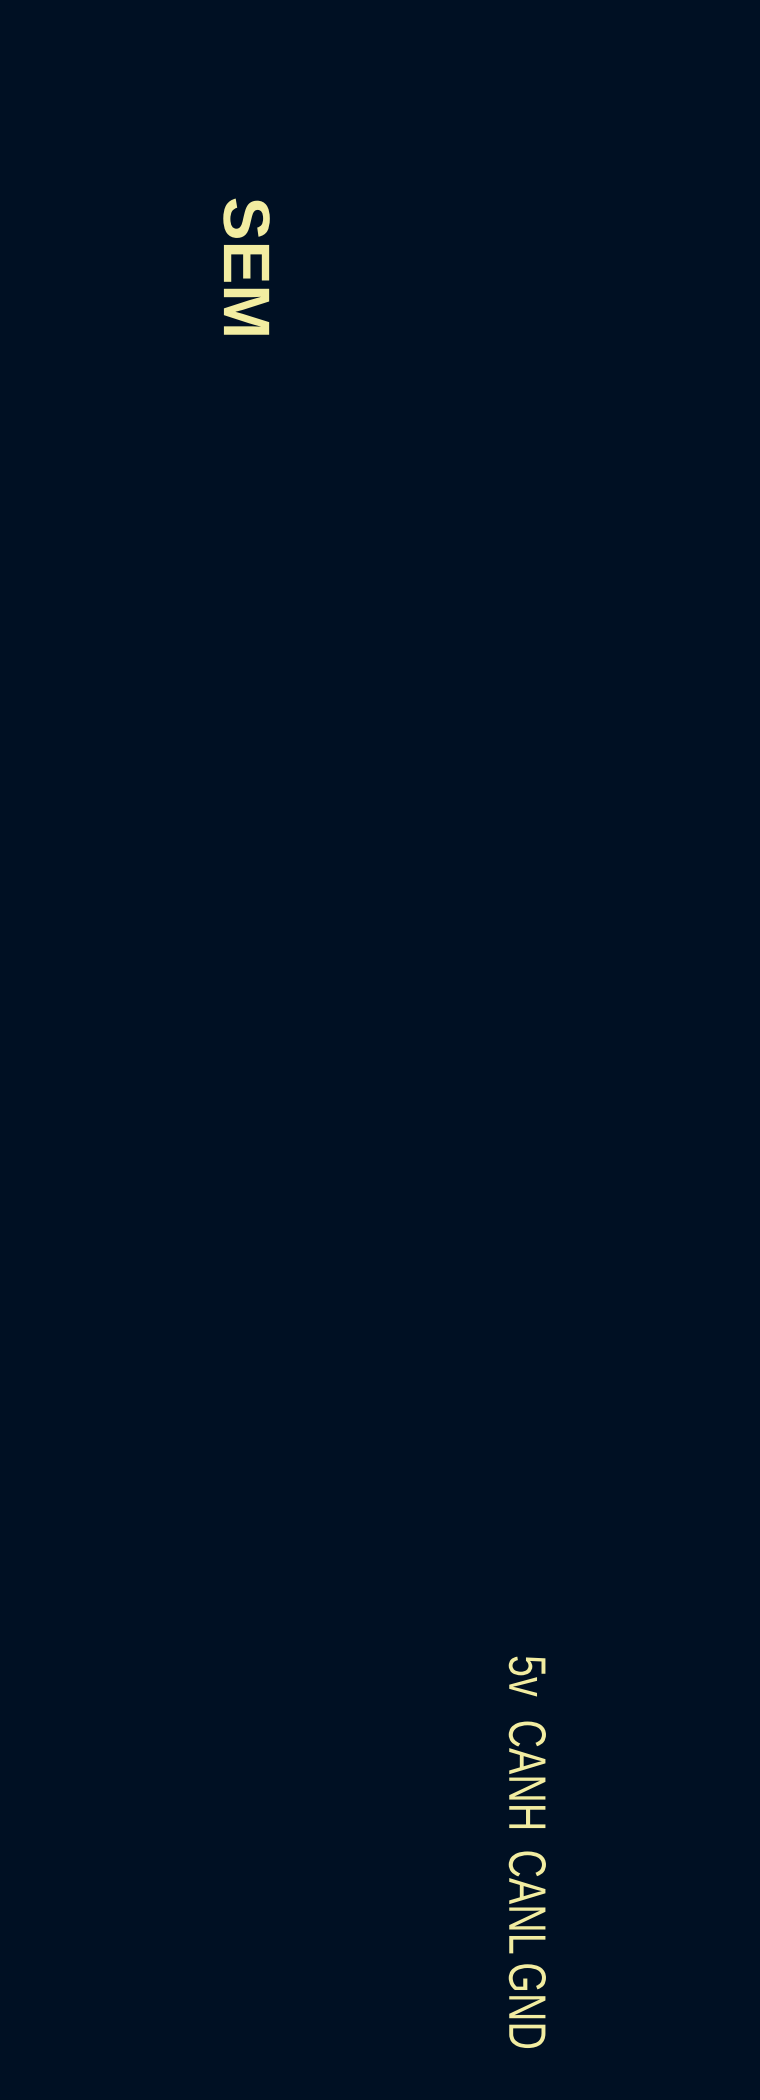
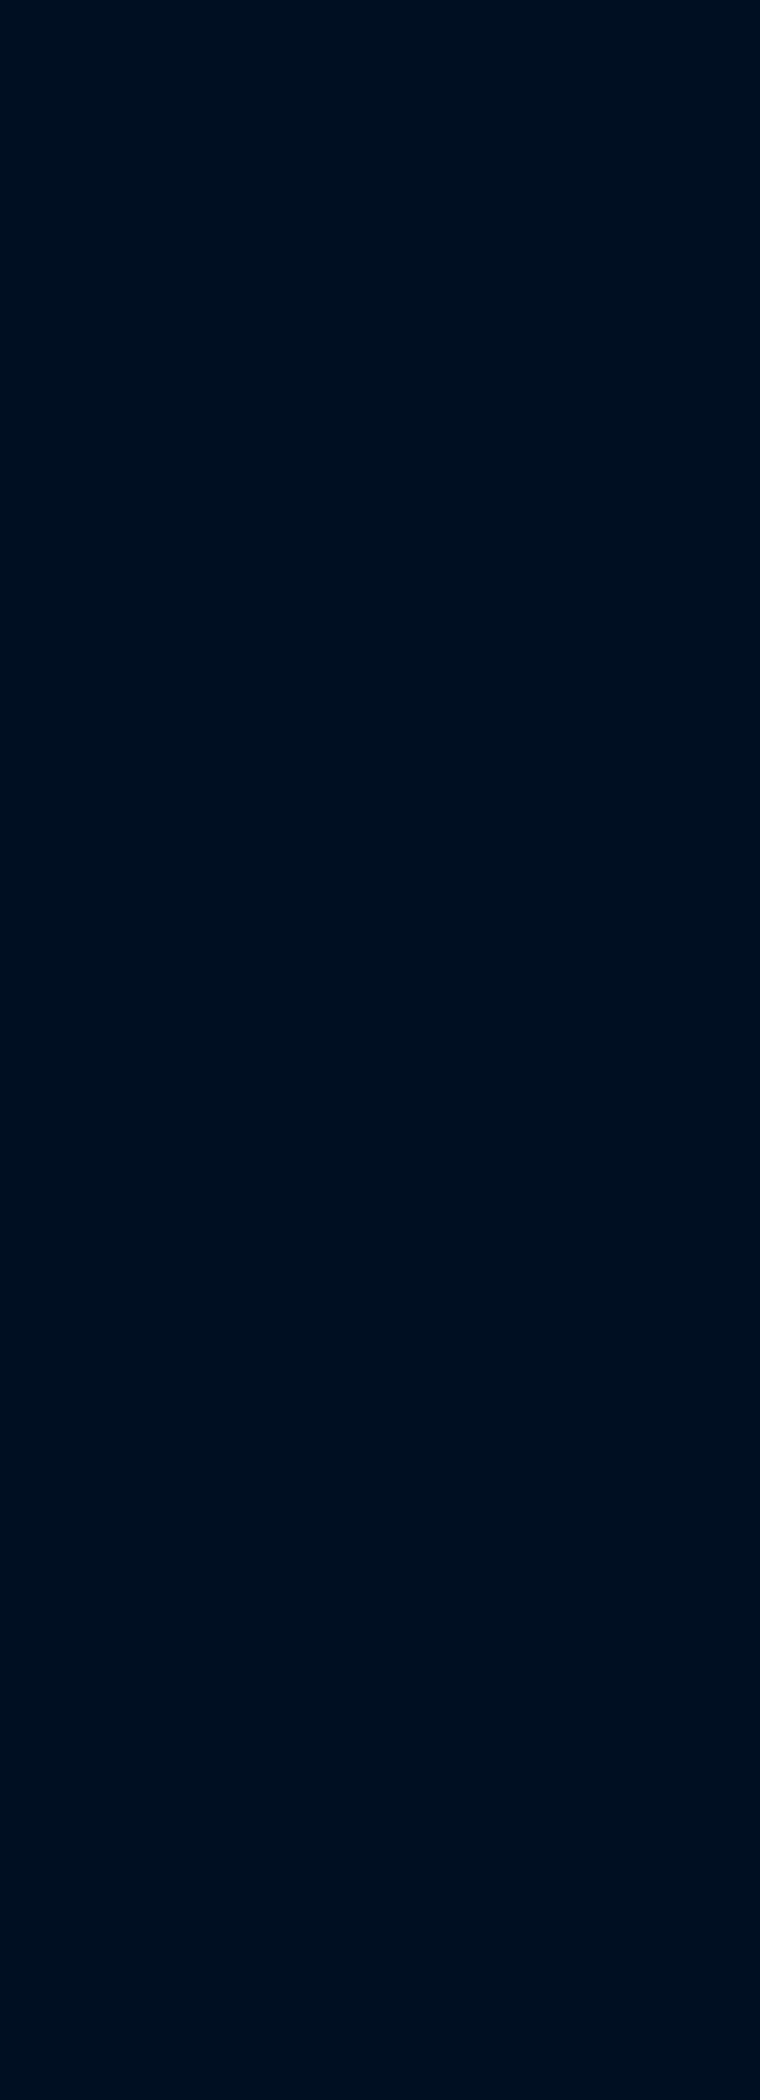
text: SEM (246, 266) -> none
text: 5v (527, 1676) -> none
text: CANH (527, 1774) -> none
text: CANL (527, 1902) -> none
text: GND (527, 2006) -> none

